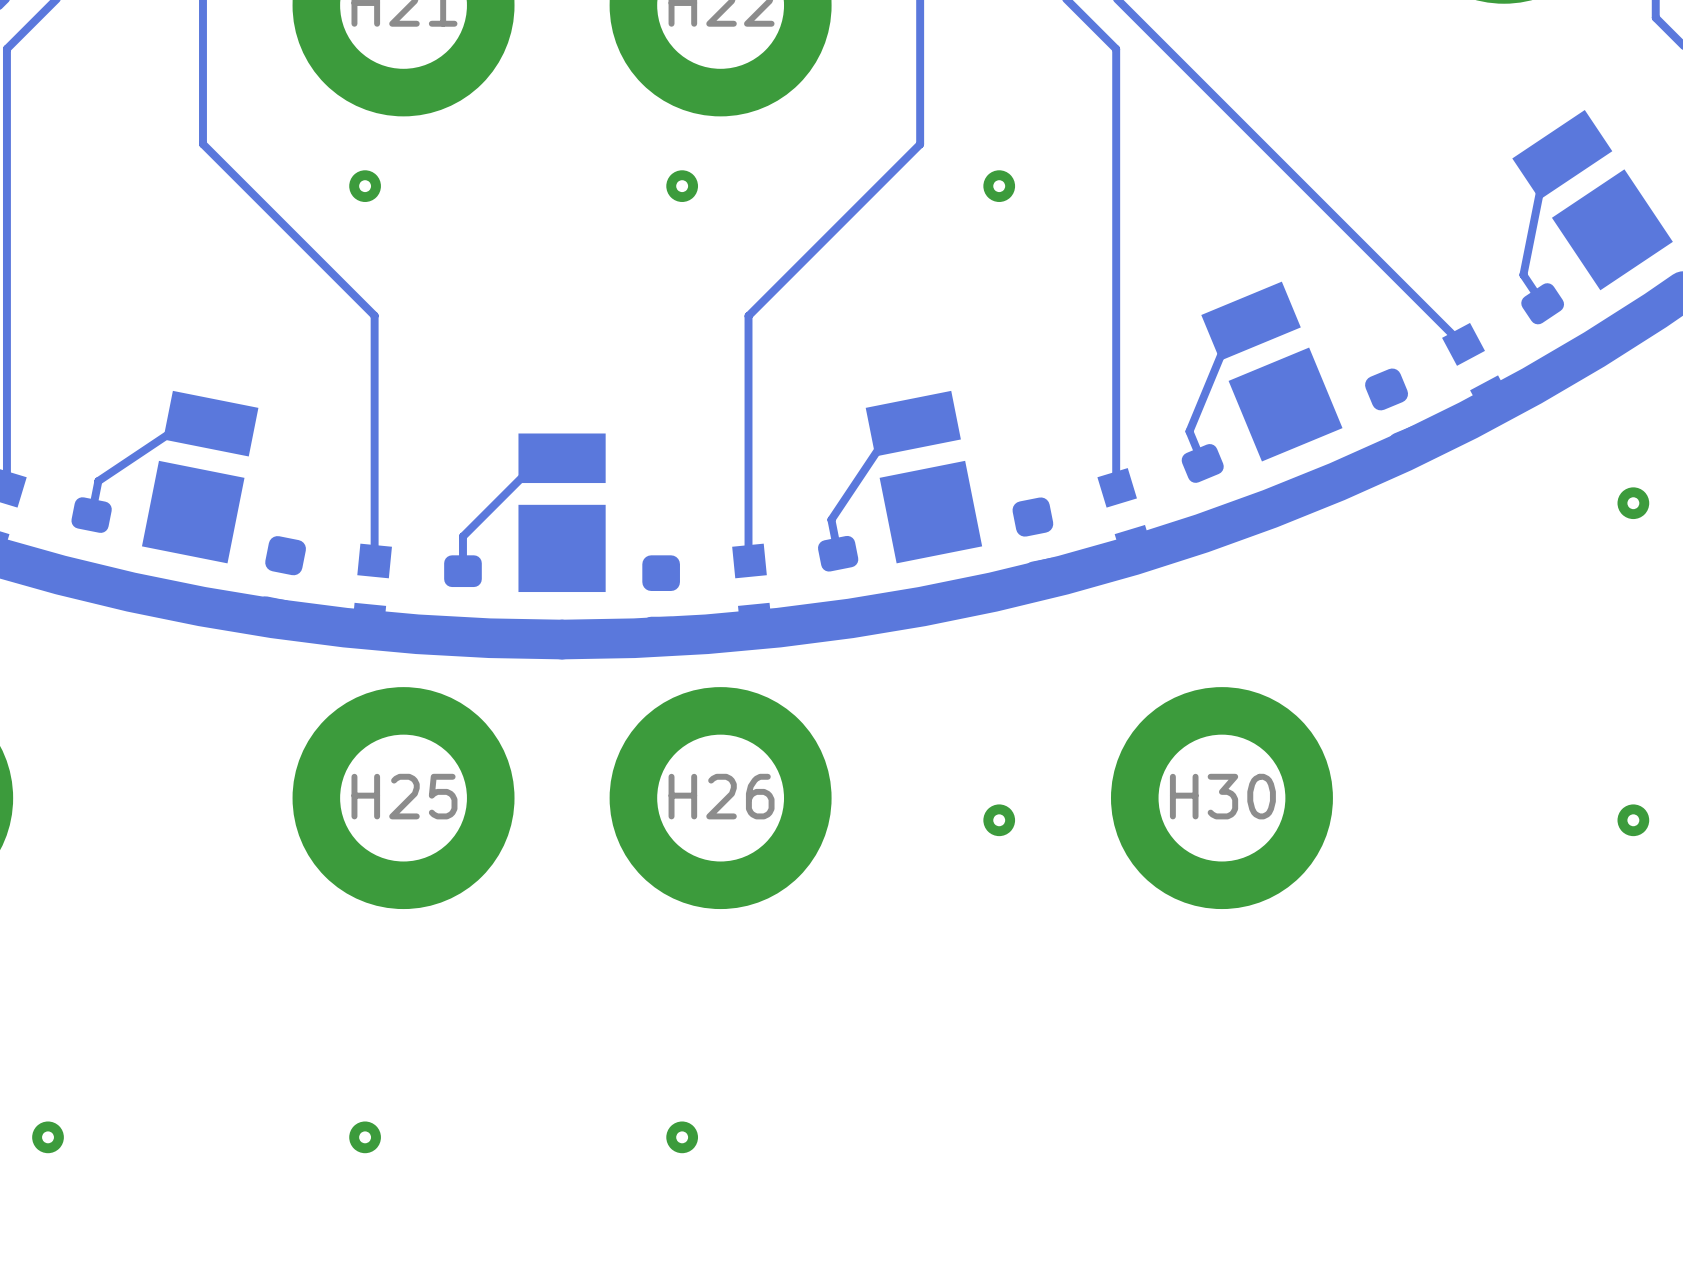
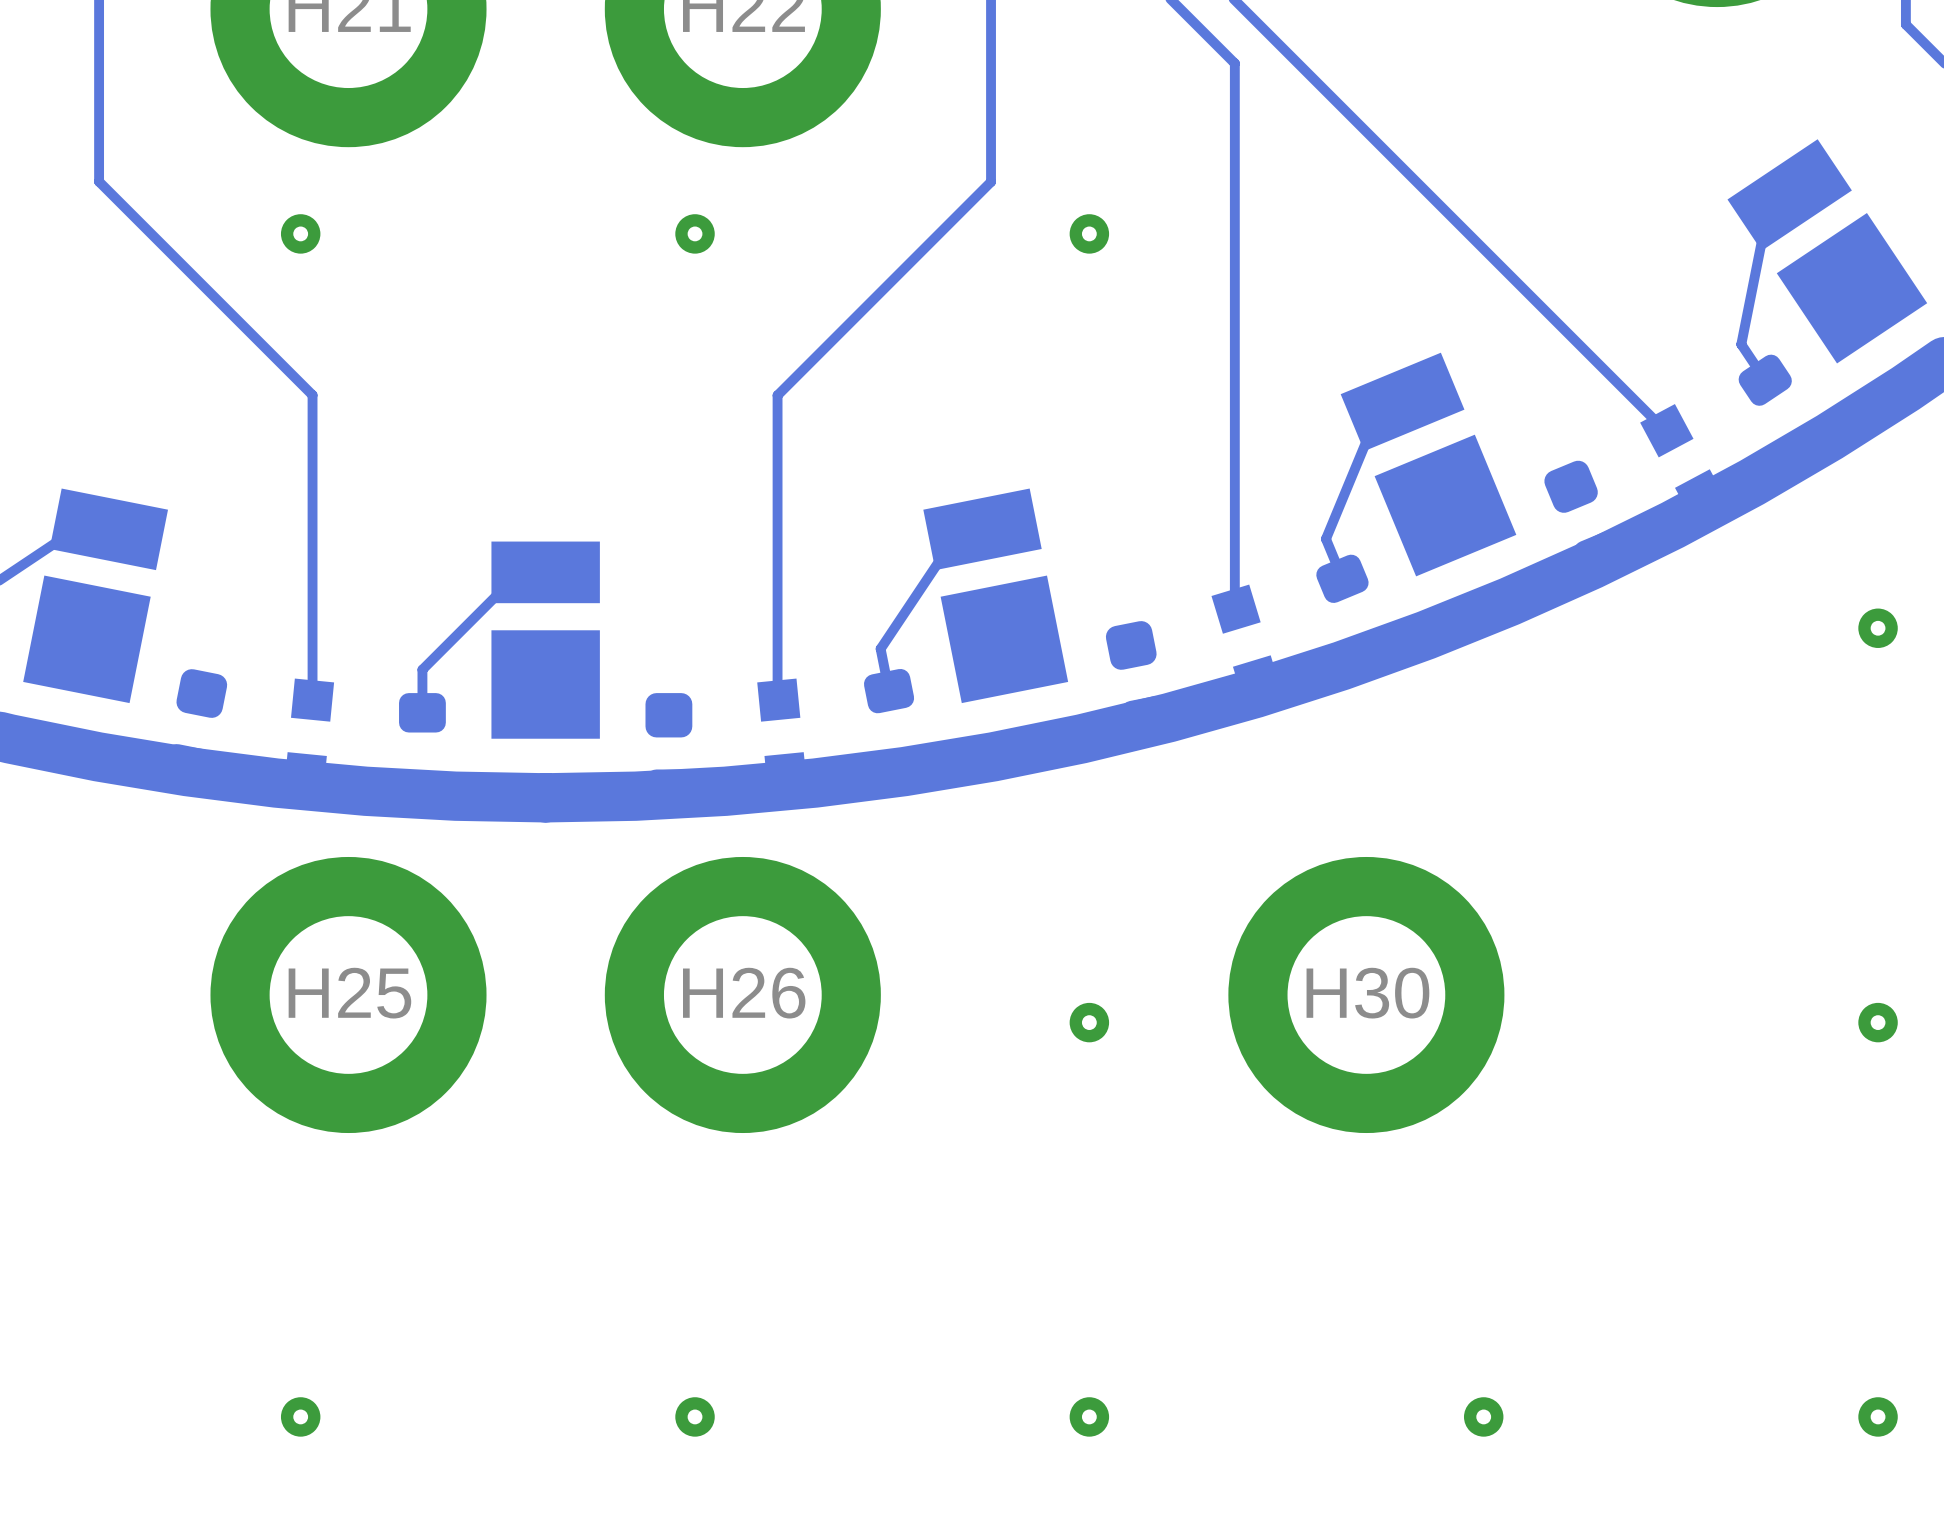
via: none -> (1089, 1416)
via: none -> (1483, 1416)
via: none -> (1878, 1416)

